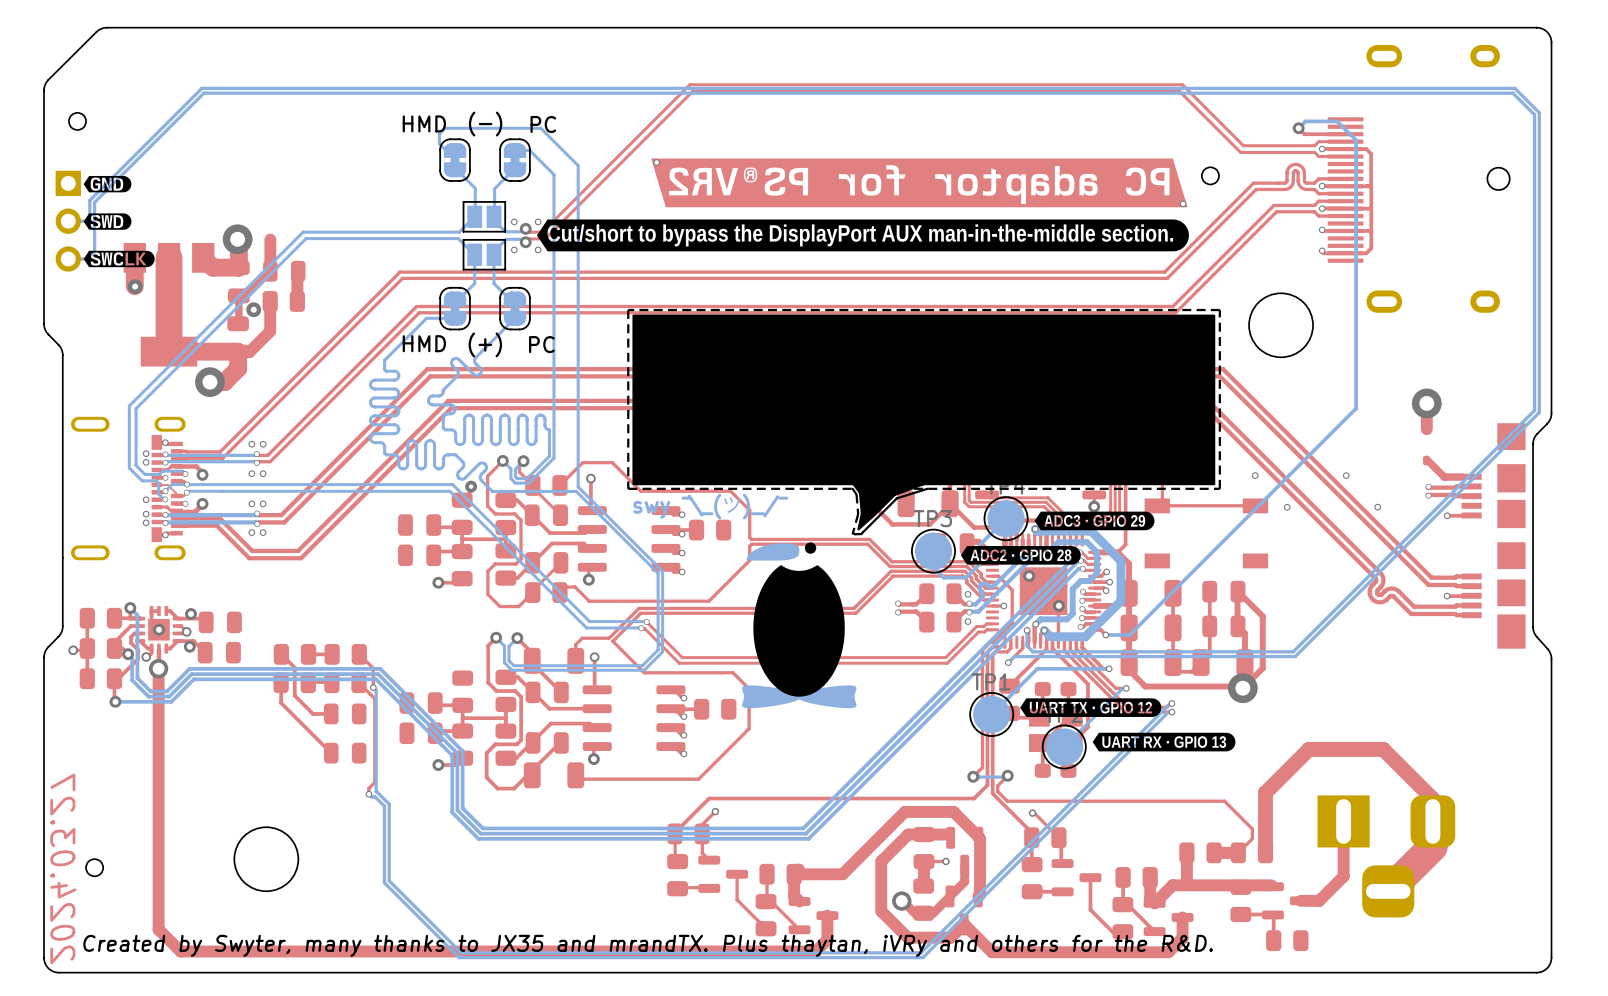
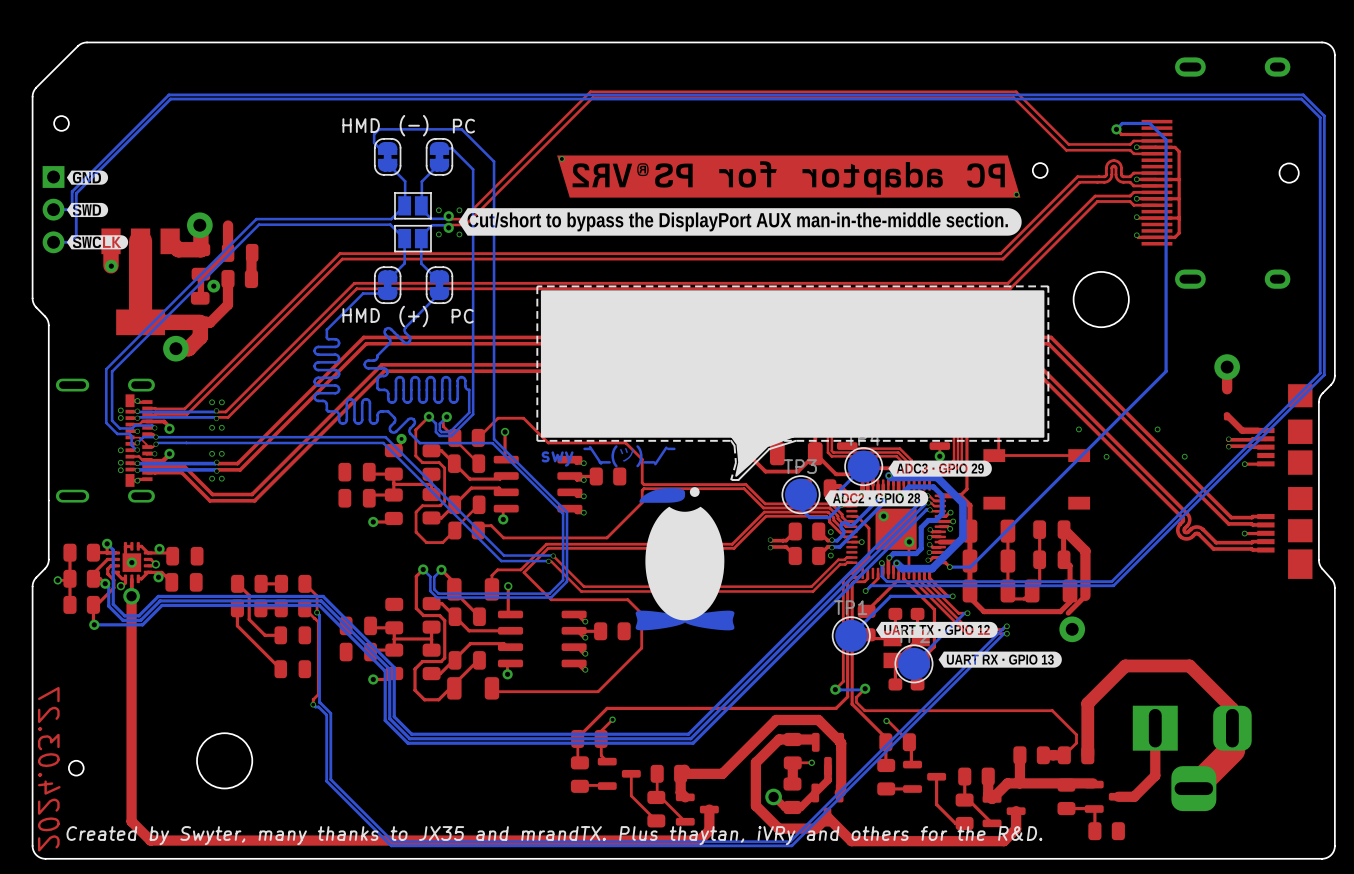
top track width: thin (1237, 591) (1262, 616) (1262, 668) -> thick (1064, 529) (1085, 551) (1085, 595)
via position: (1242, 688) -> (1072, 629)

